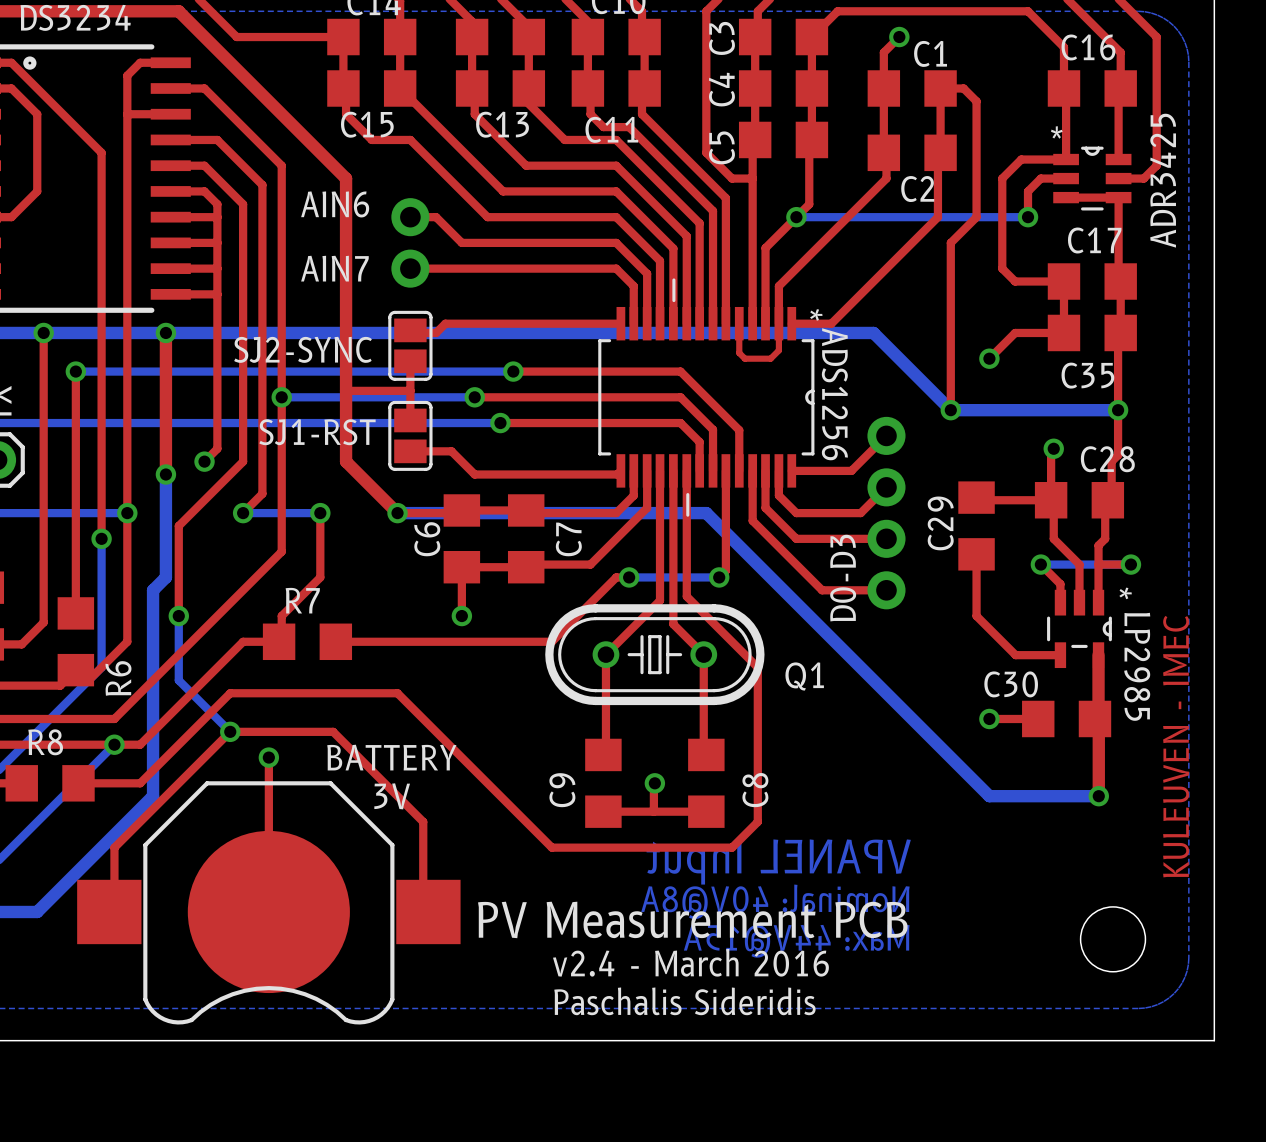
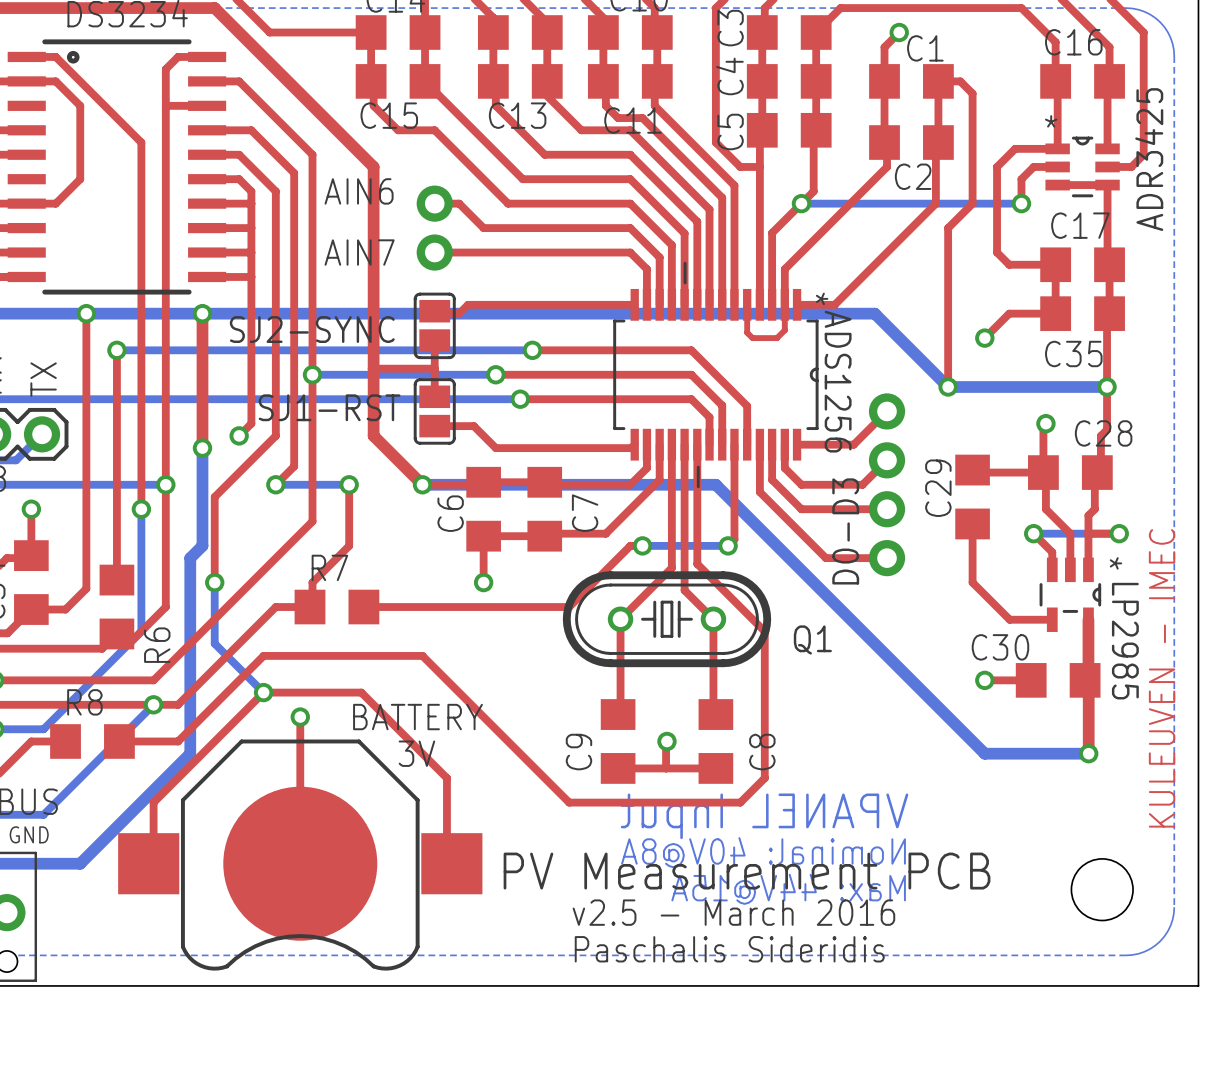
text: v2.4 - March 2016 (690, 962) -> v2.5 - March 2016 (733, 912)

